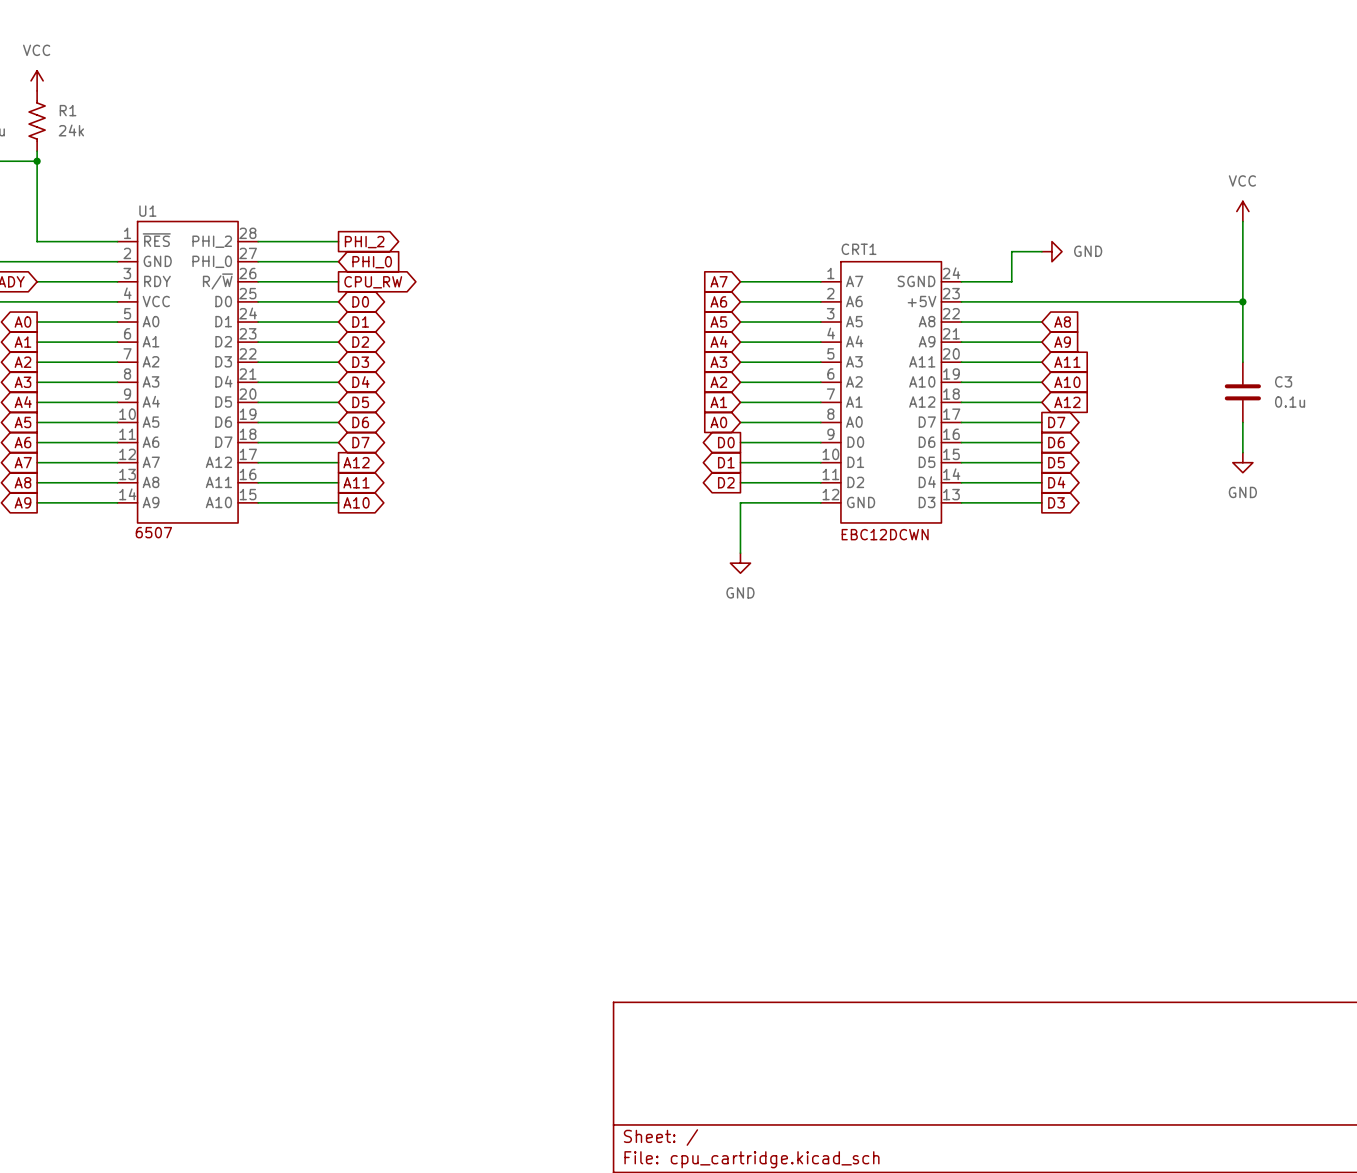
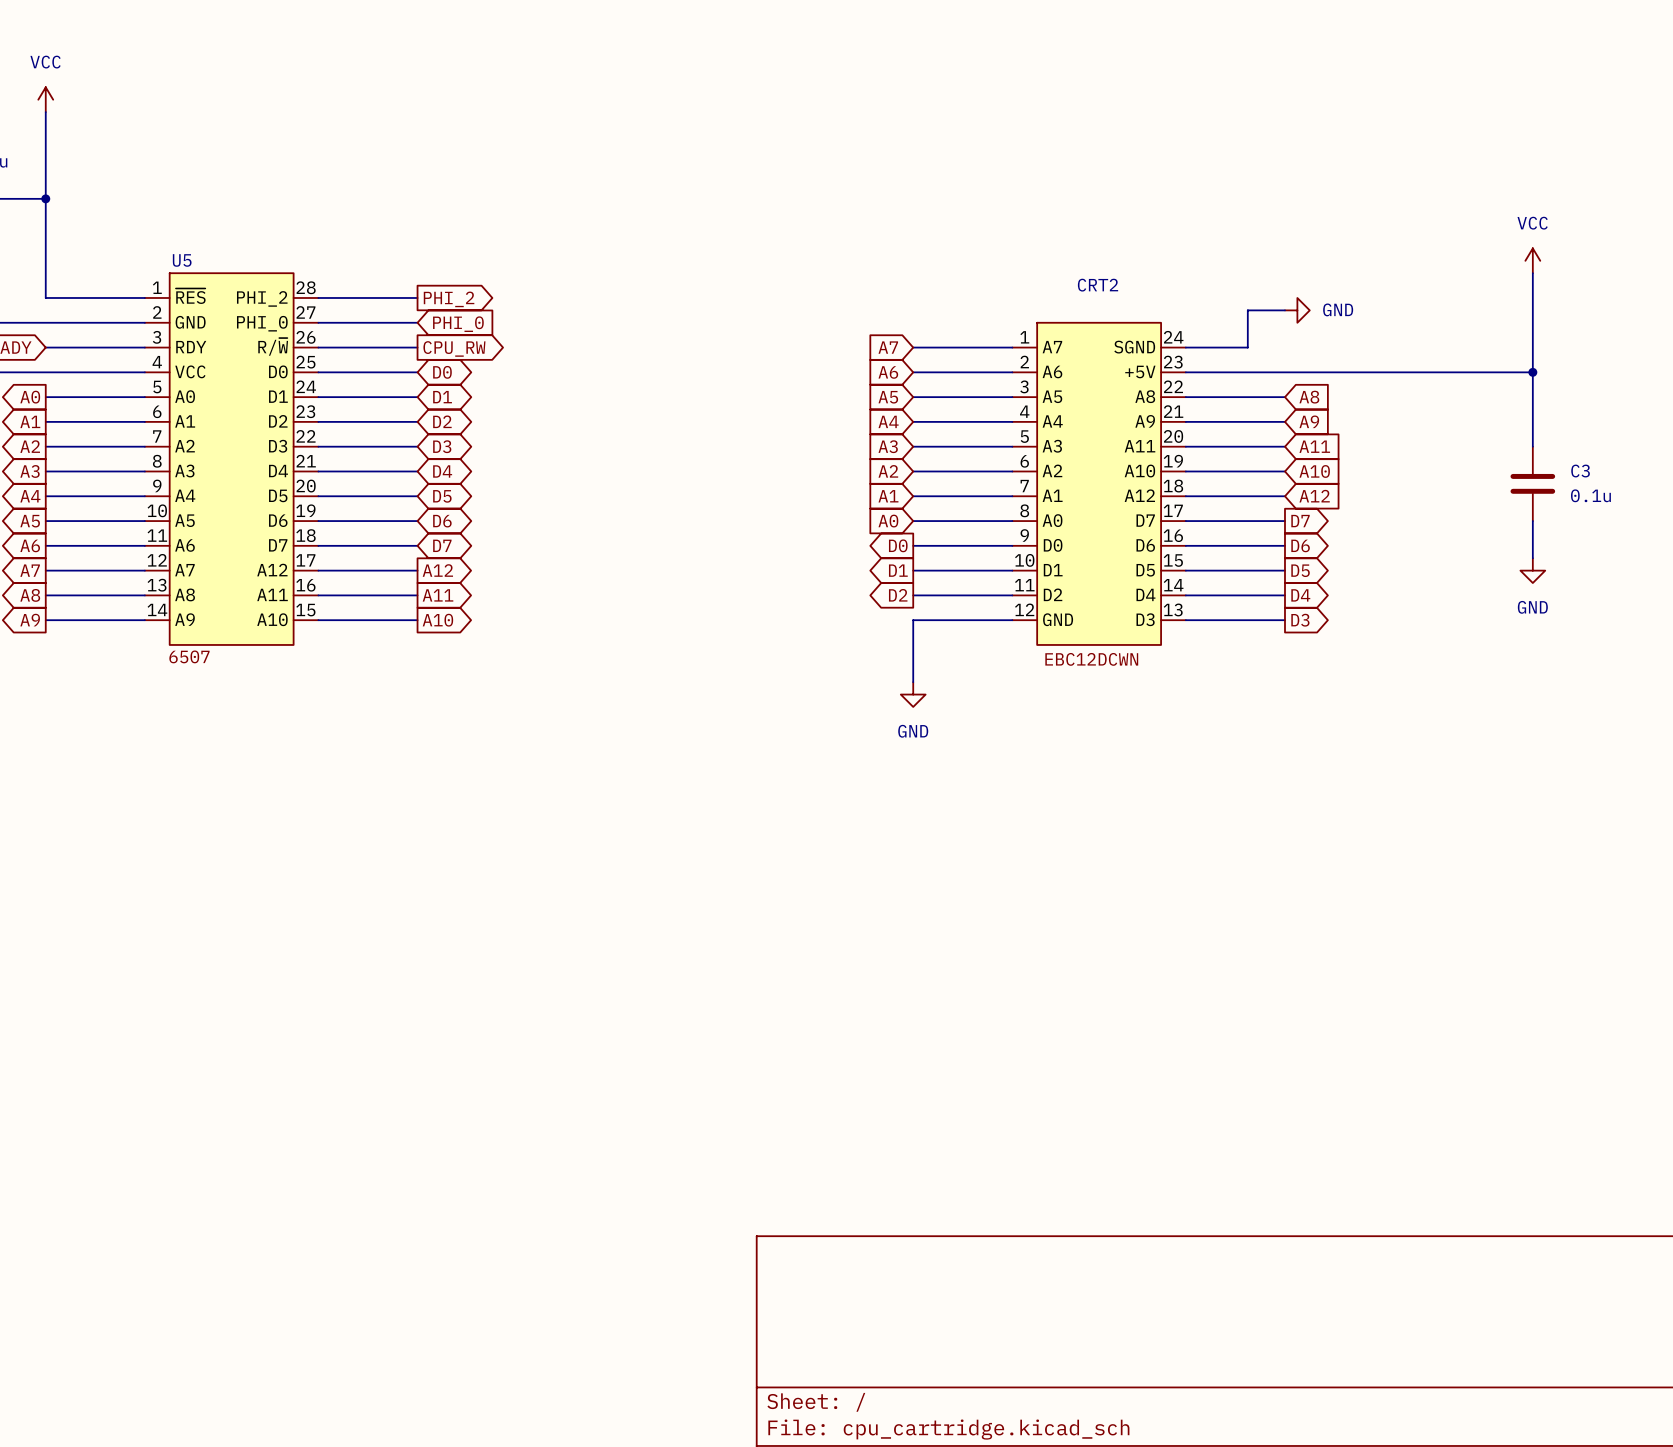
R1: 24k (37, 121) -> none
U1 name: U1 (147, 211) -> U5 (182, 260)
CRT1 name: CRT1 (859, 249) -> CRT2 (1098, 285)

